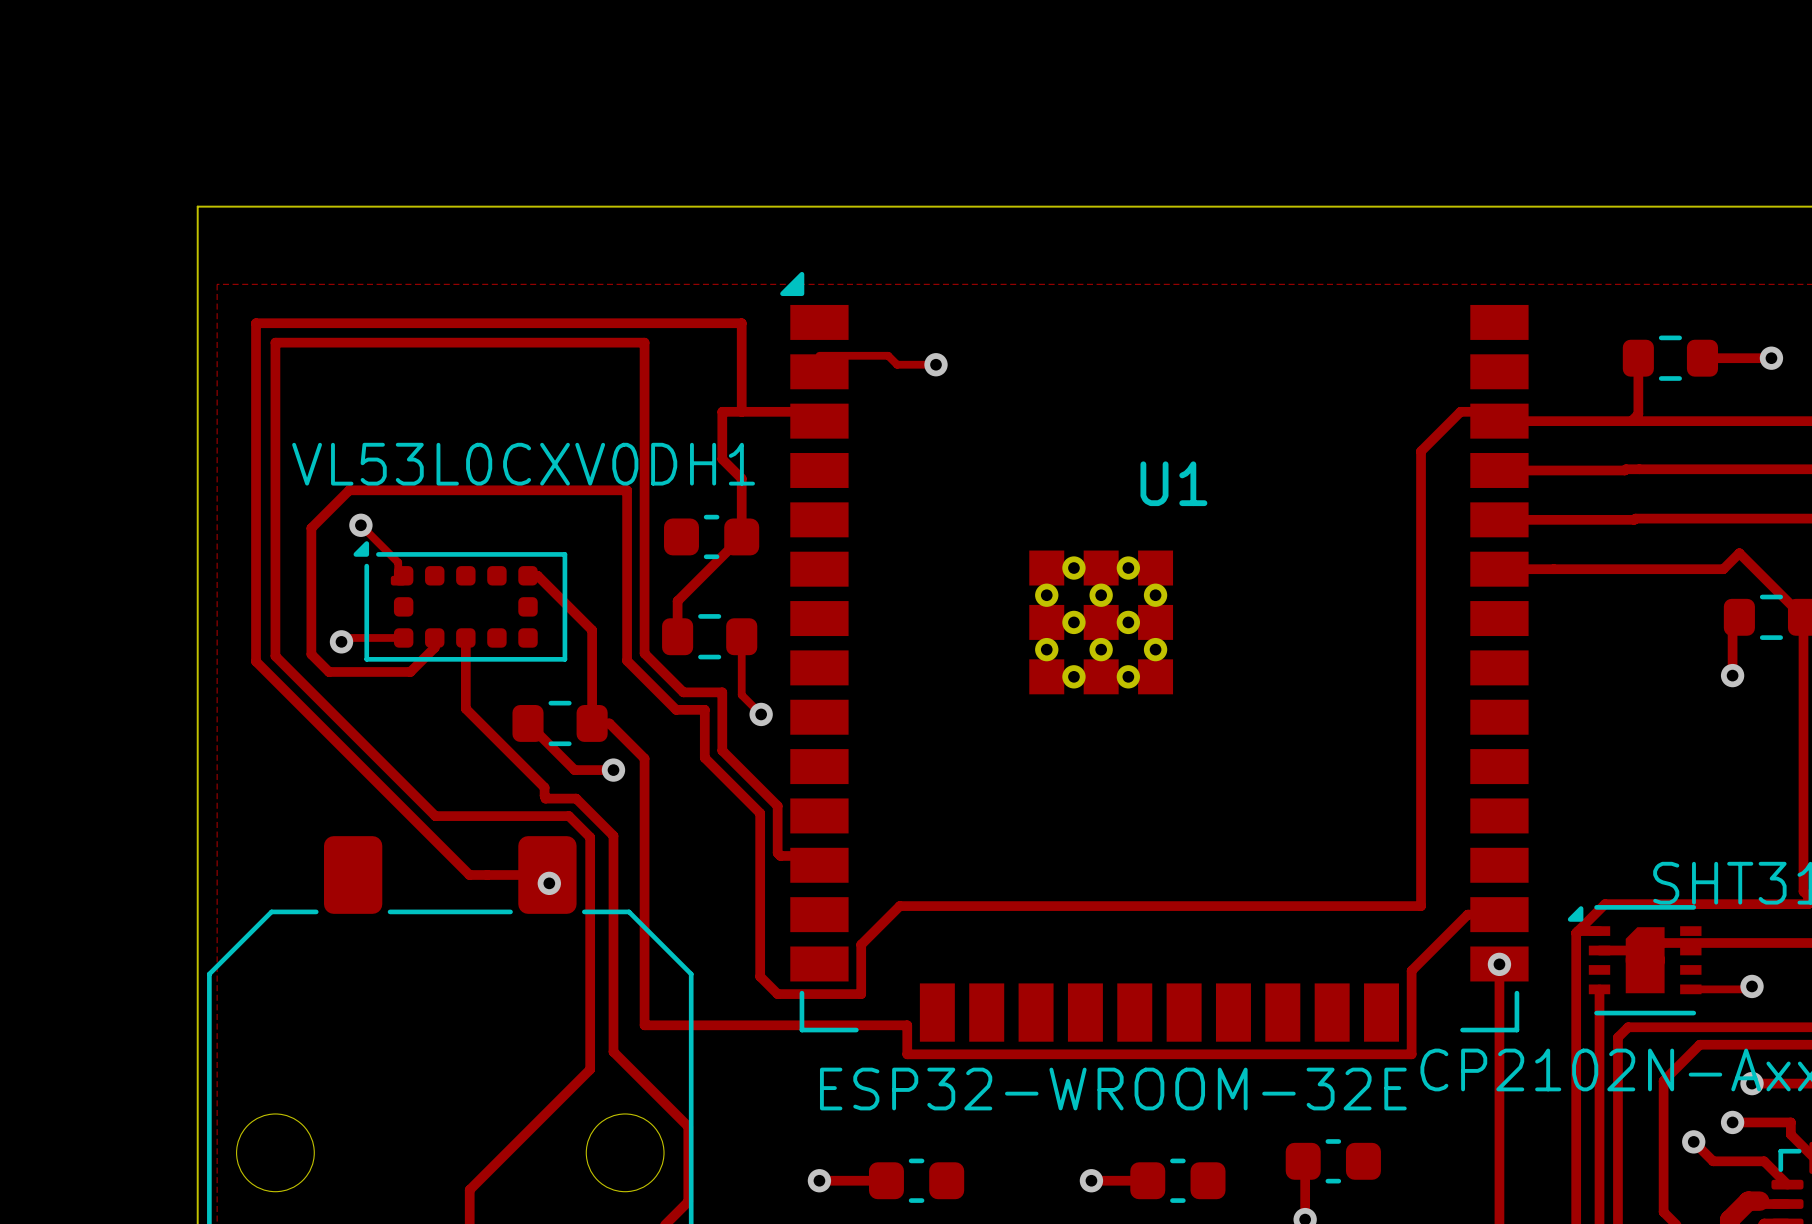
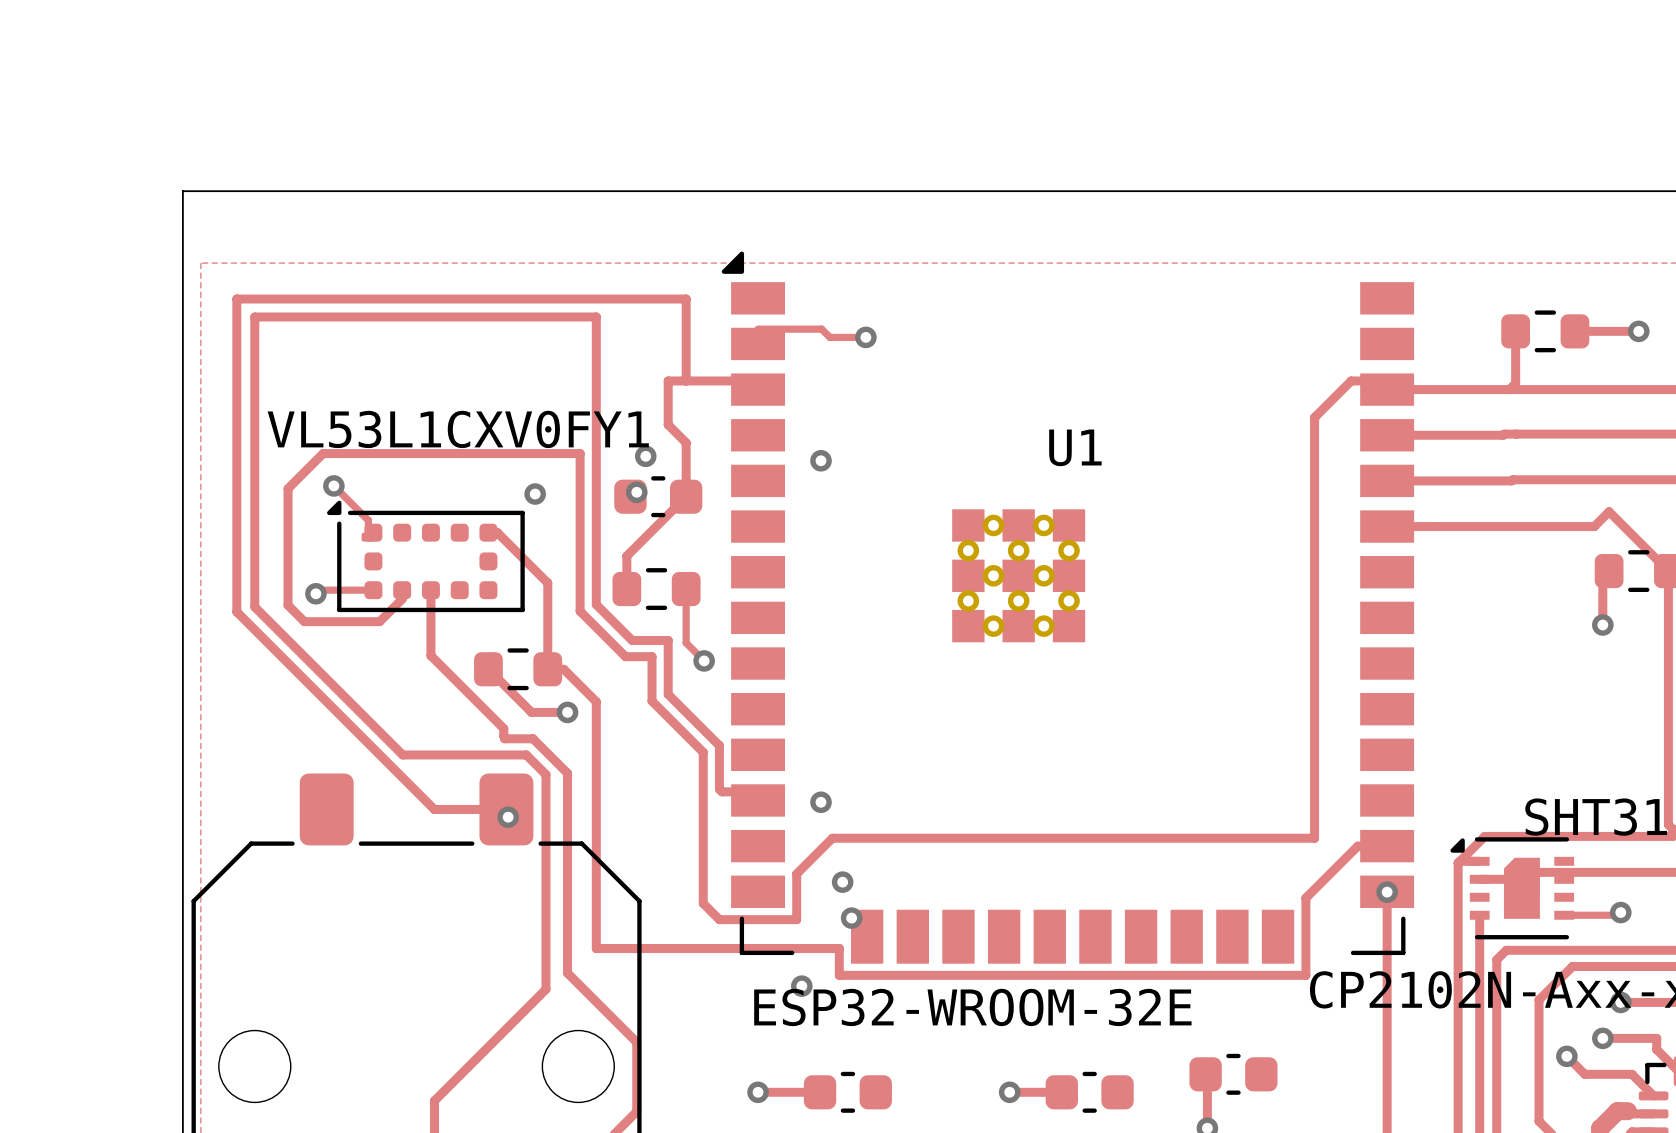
text: VL53L0CXV0DH1 (523, 464) -> VL53L1CXV0FY1 (458, 429)
via: none -> (645, 456)
via: none -> (821, 460)
via: none -> (636, 492)
via: none -> (535, 494)
via: none -> (821, 802)
via: none -> (842, 882)
via: none -> (851, 918)
via: none -> (801, 986)

